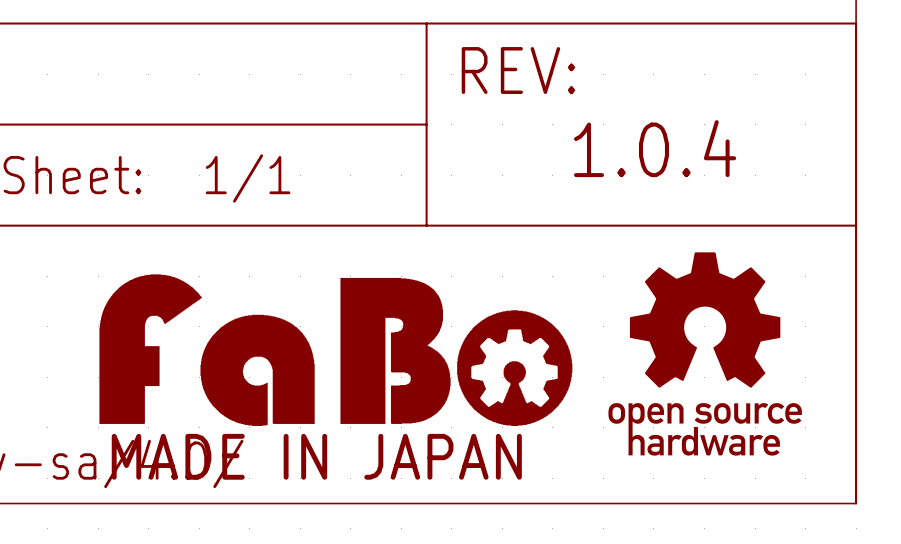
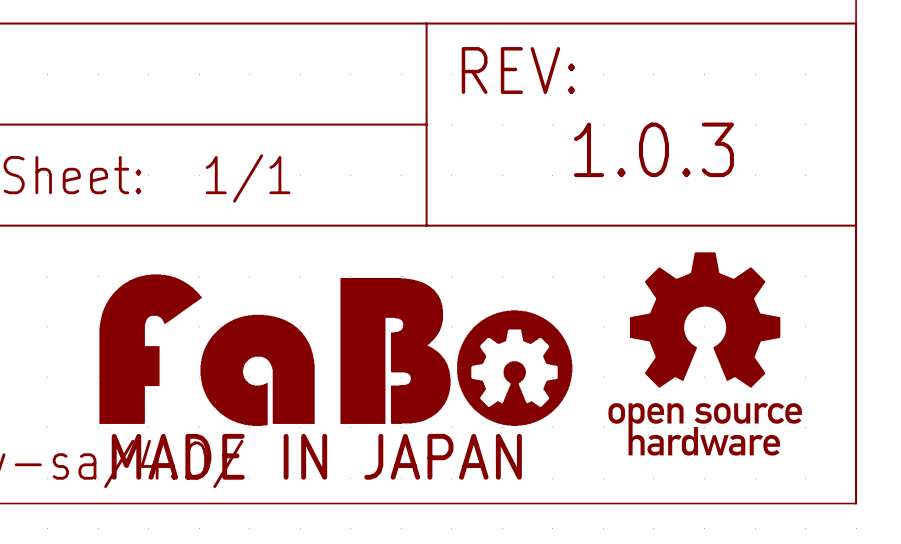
text: 1.0.4 (655, 148) -> 1.0.3 (653, 149)

